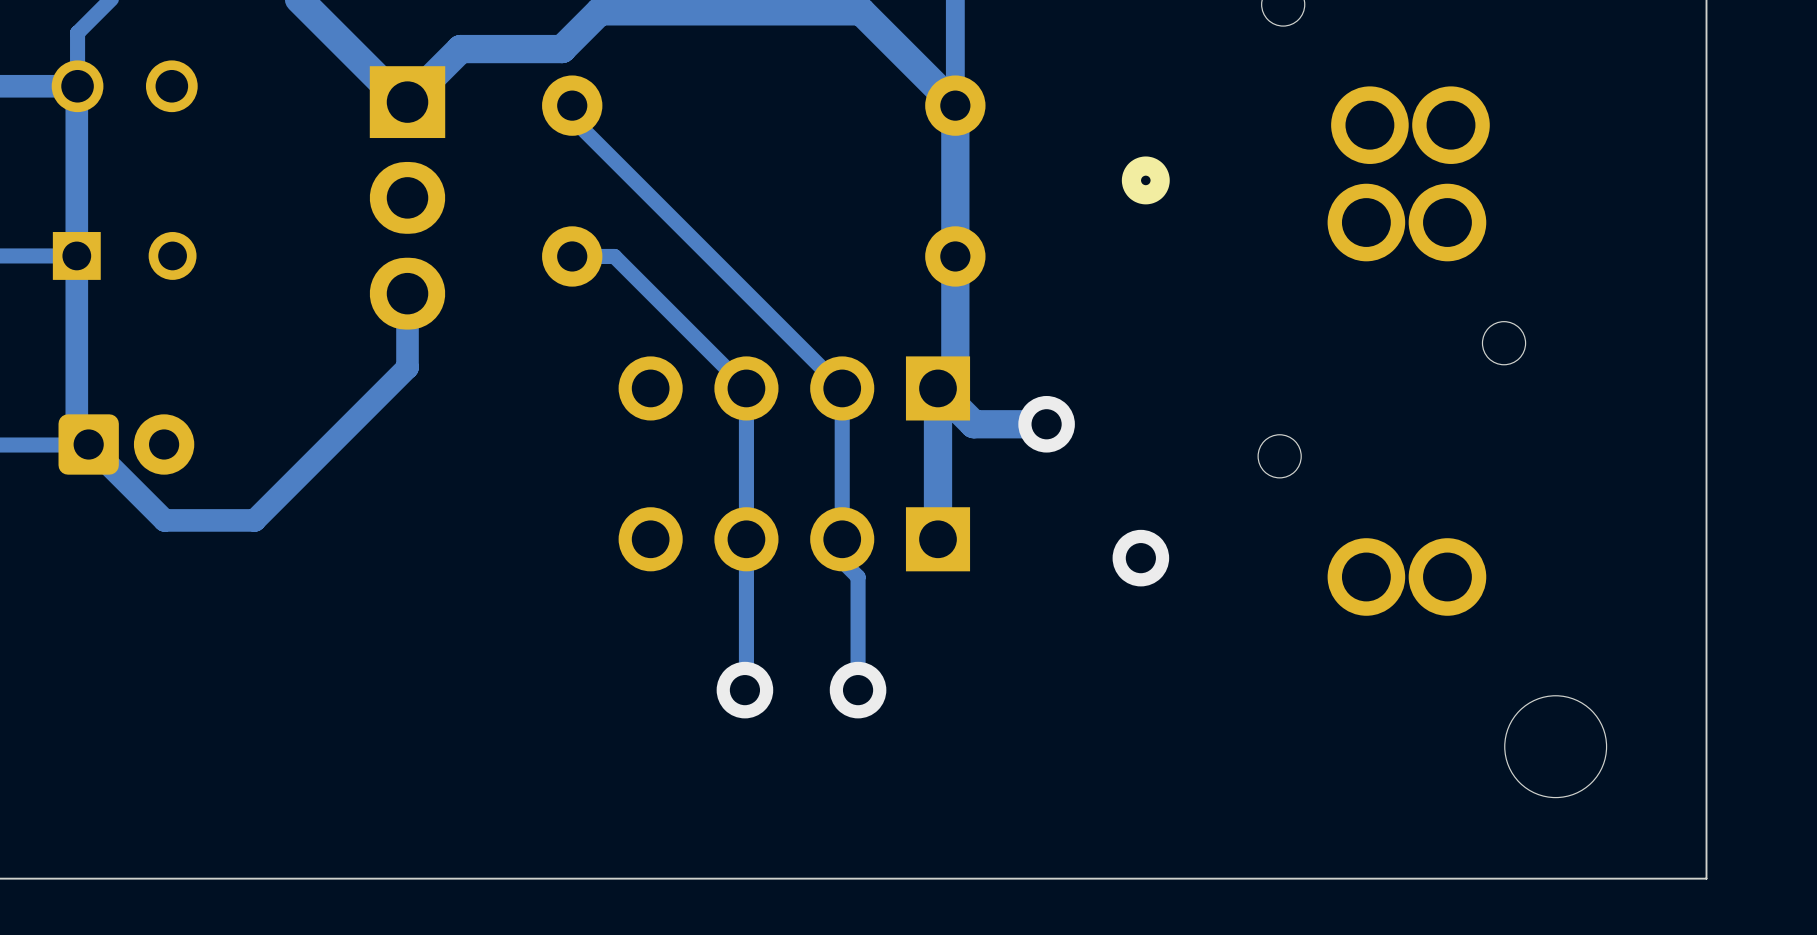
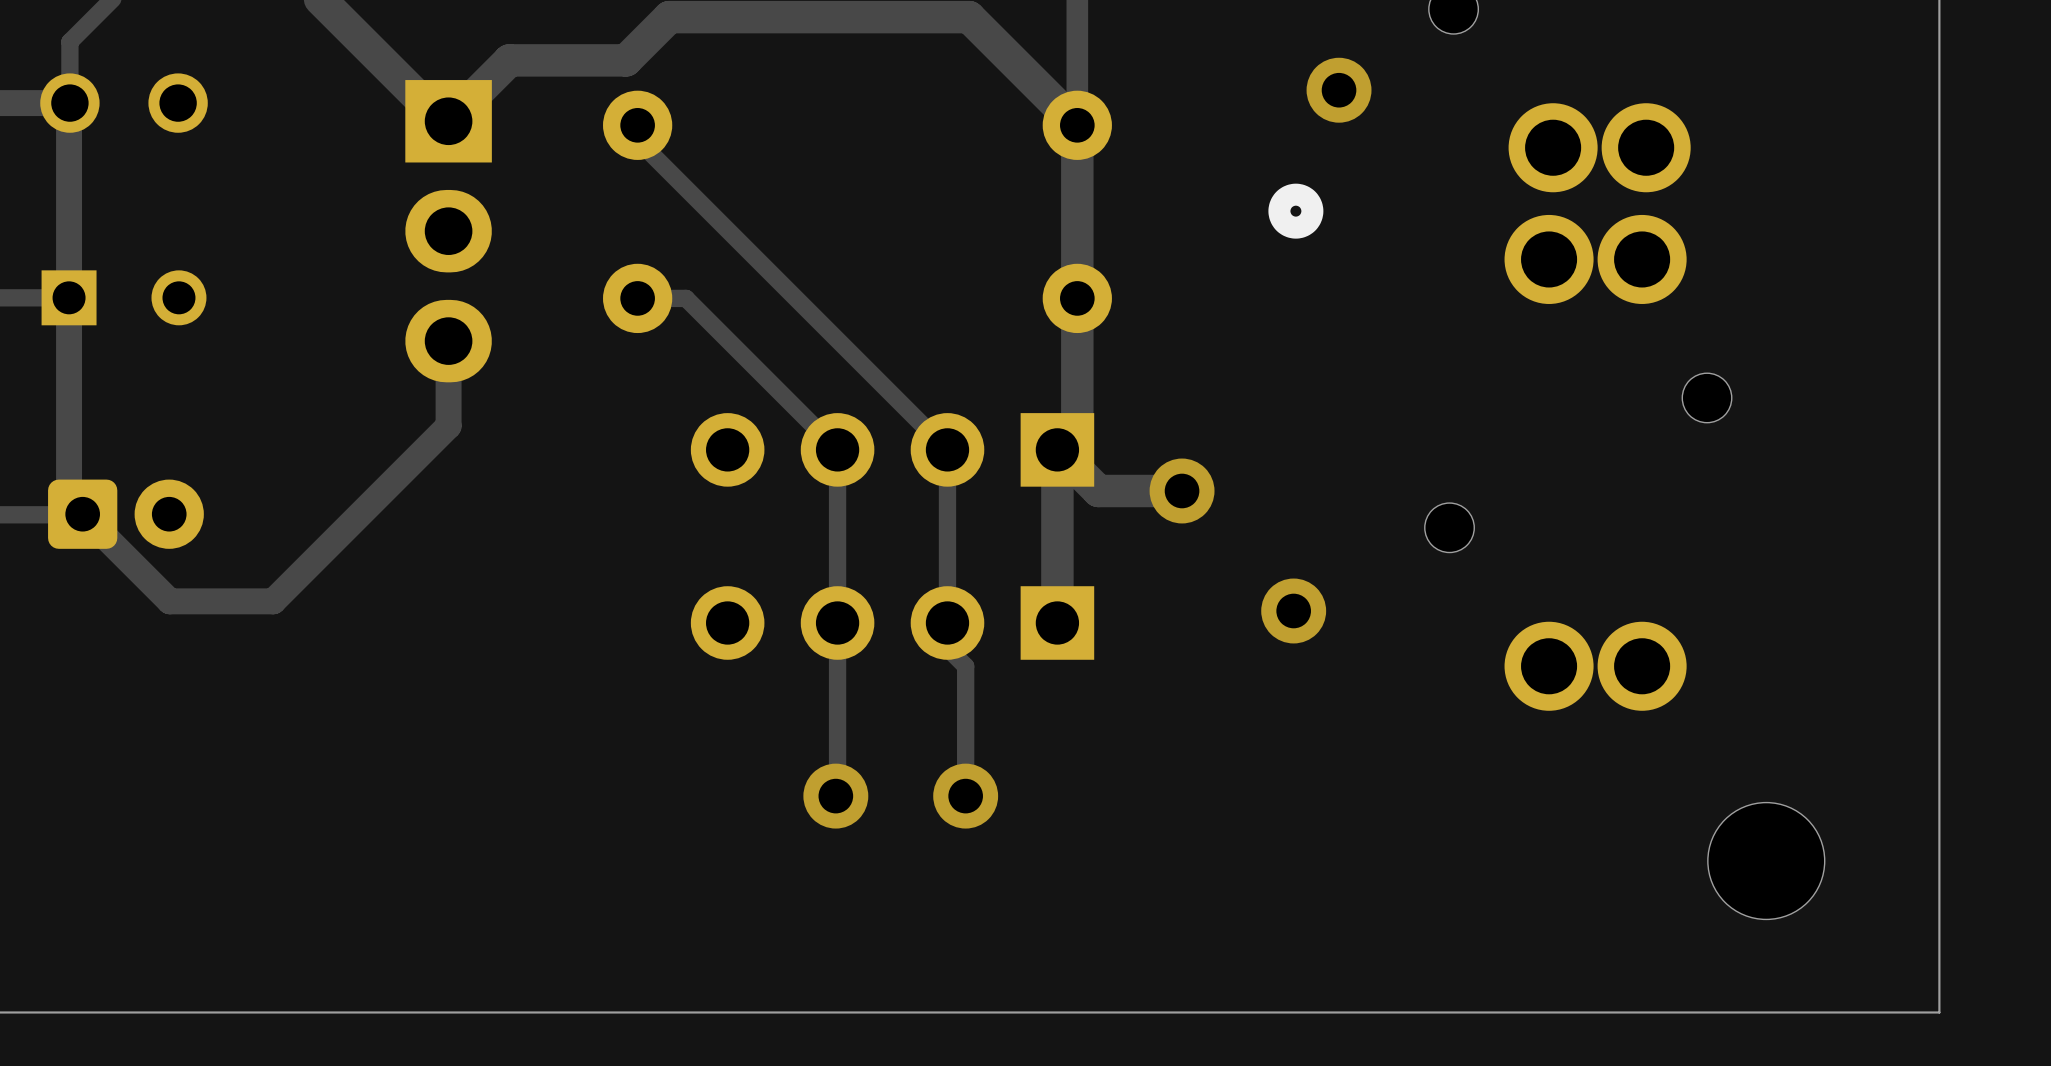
via: none -> (1339, 90)
via position: (1140, 558) -> (1293, 610)

